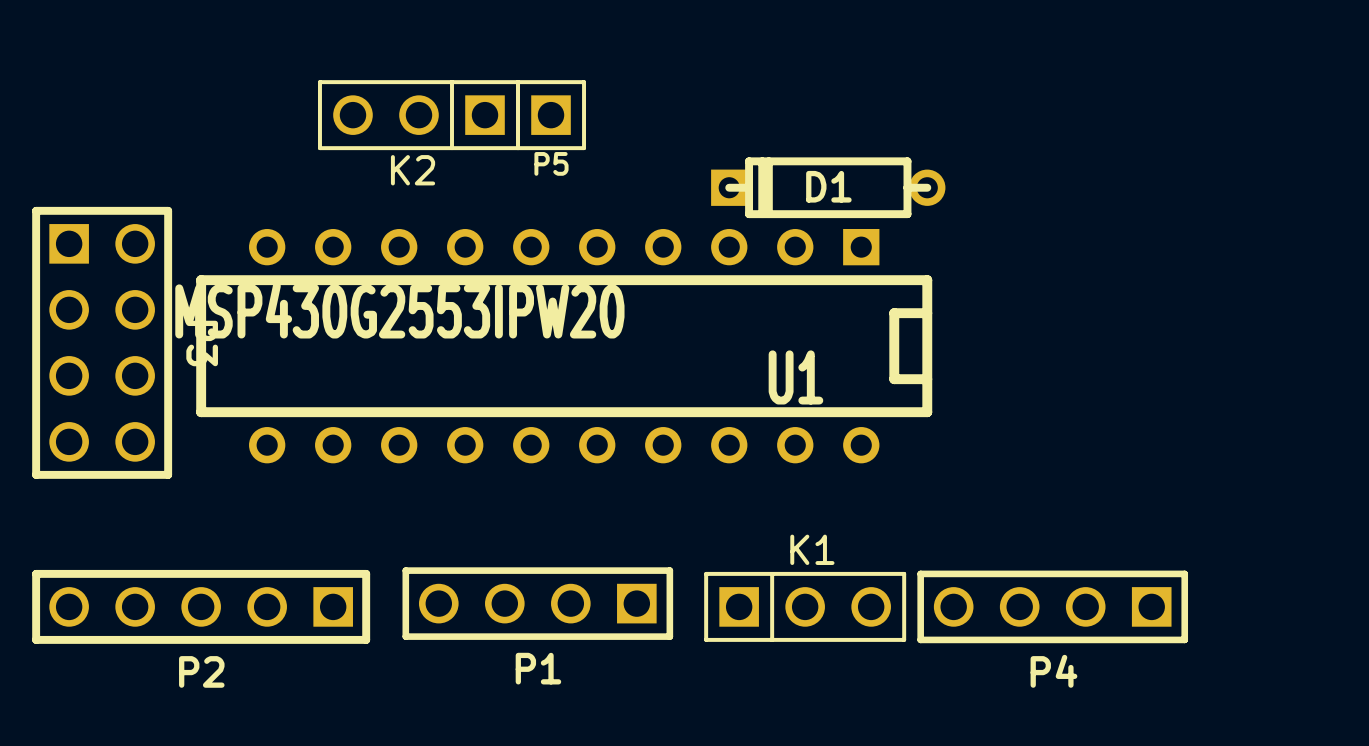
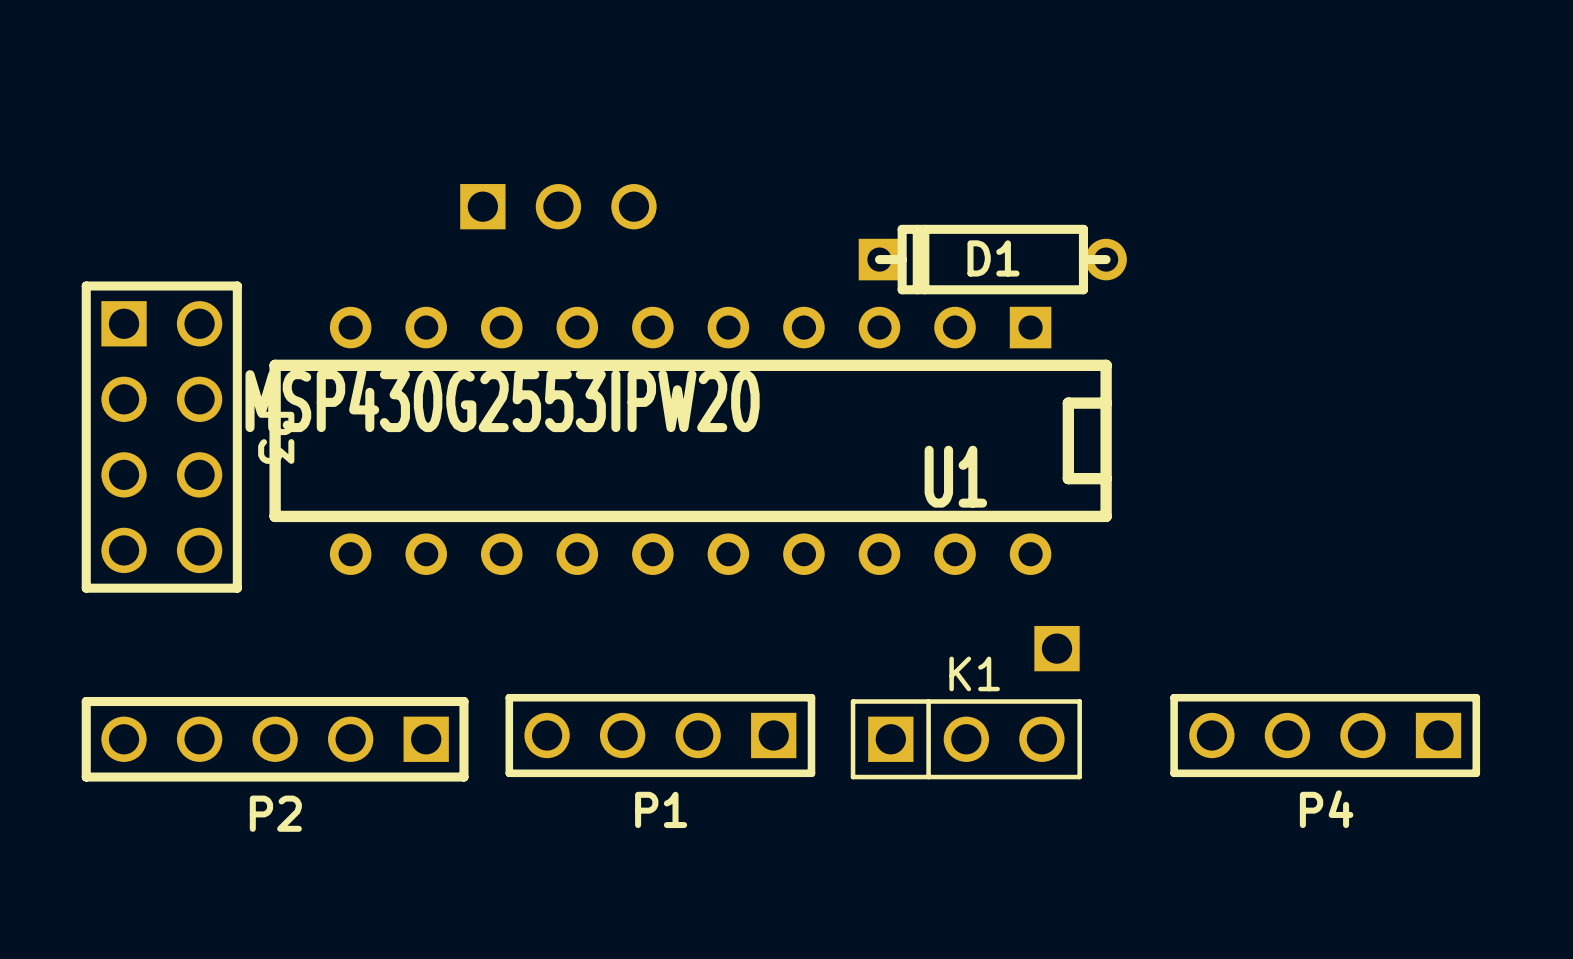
K2 side: bottom (418, 115) -> top (558, 206)
P5 side: bottom (551, 115) -> top (1057, 648)
P4 position: (1052, 606) -> (1325, 735)

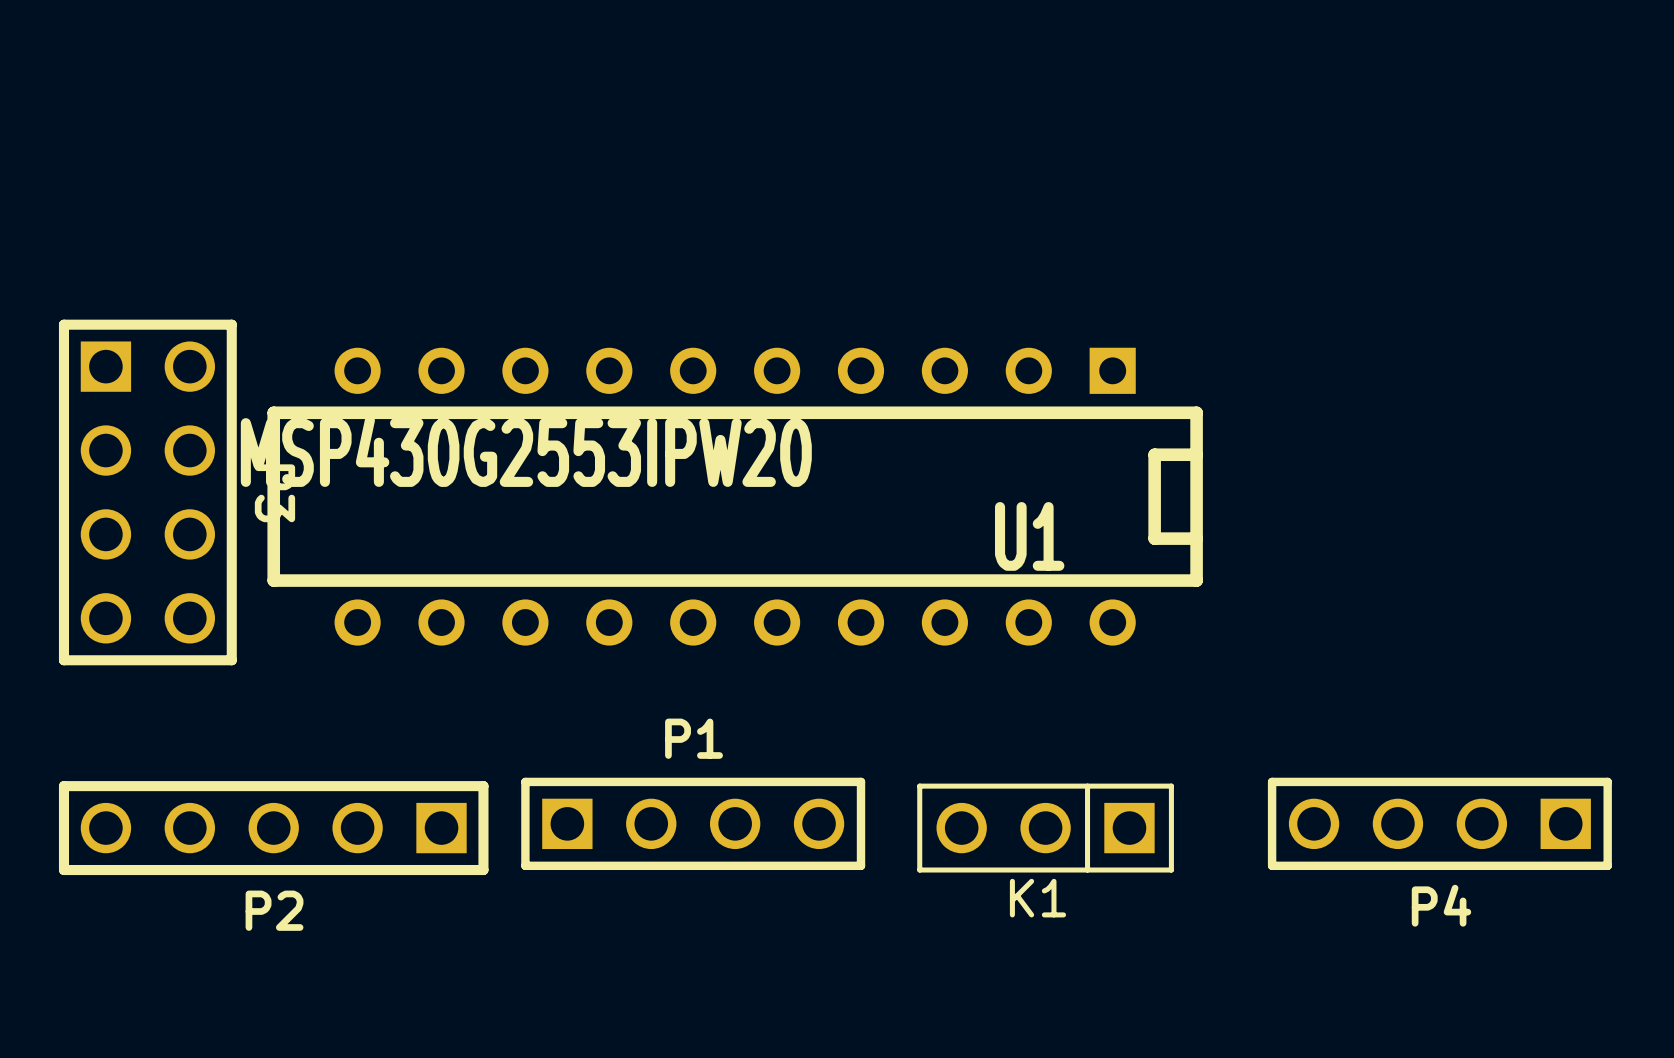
part: (558, 206) -> none
D1: (992, 259) -> none
part: (1057, 648) -> none
P1 rotation: 0° (660, 735) -> 180° (693, 823)
K1 rotation: 0° (966, 739) -> 180° (1045, 828)

